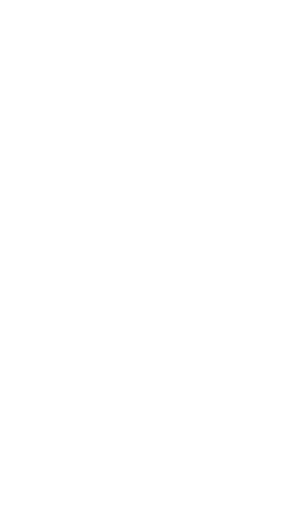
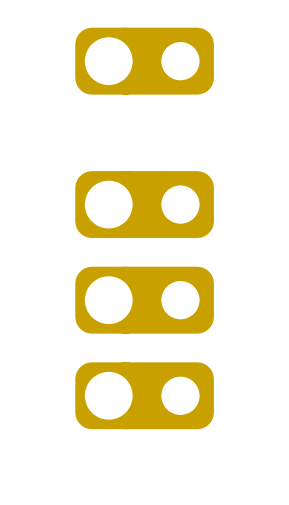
part: none -> (144, 61)
part: none -> (144, 204)
part: none -> (144, 300)
part: none -> (144, 395)

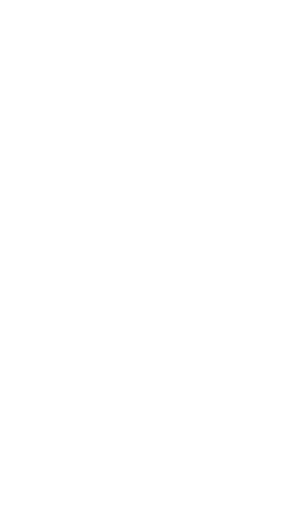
part: (144, 61) -> none
part: (144, 204) -> none
part: (144, 300) -> none
part: (144, 395) -> none

